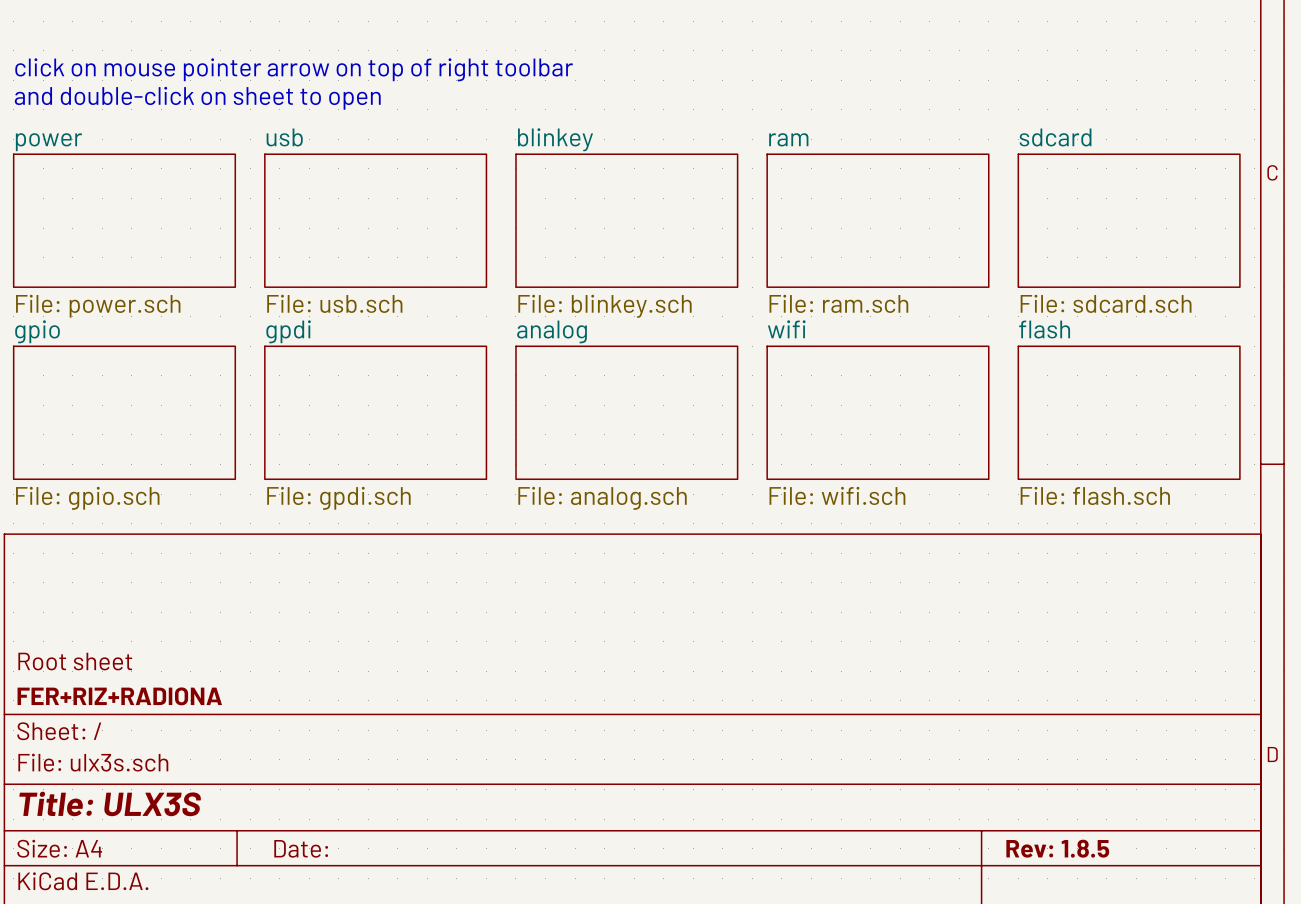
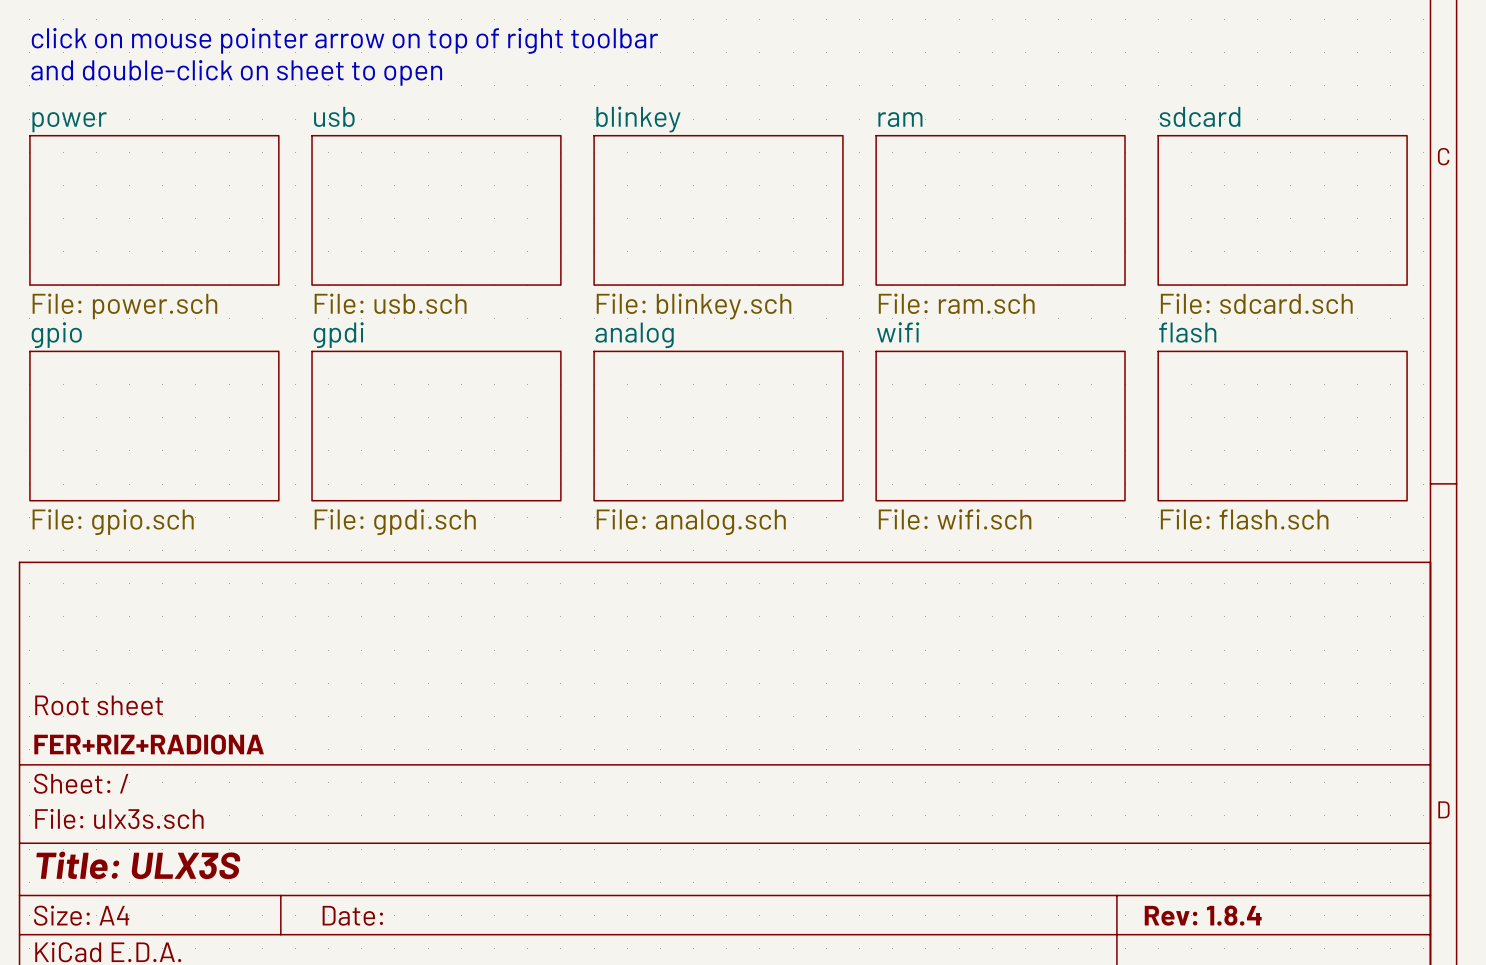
title block: Rev: 1.8.5 (1057, 848) -> Rev: 1.8.4 (1203, 915)

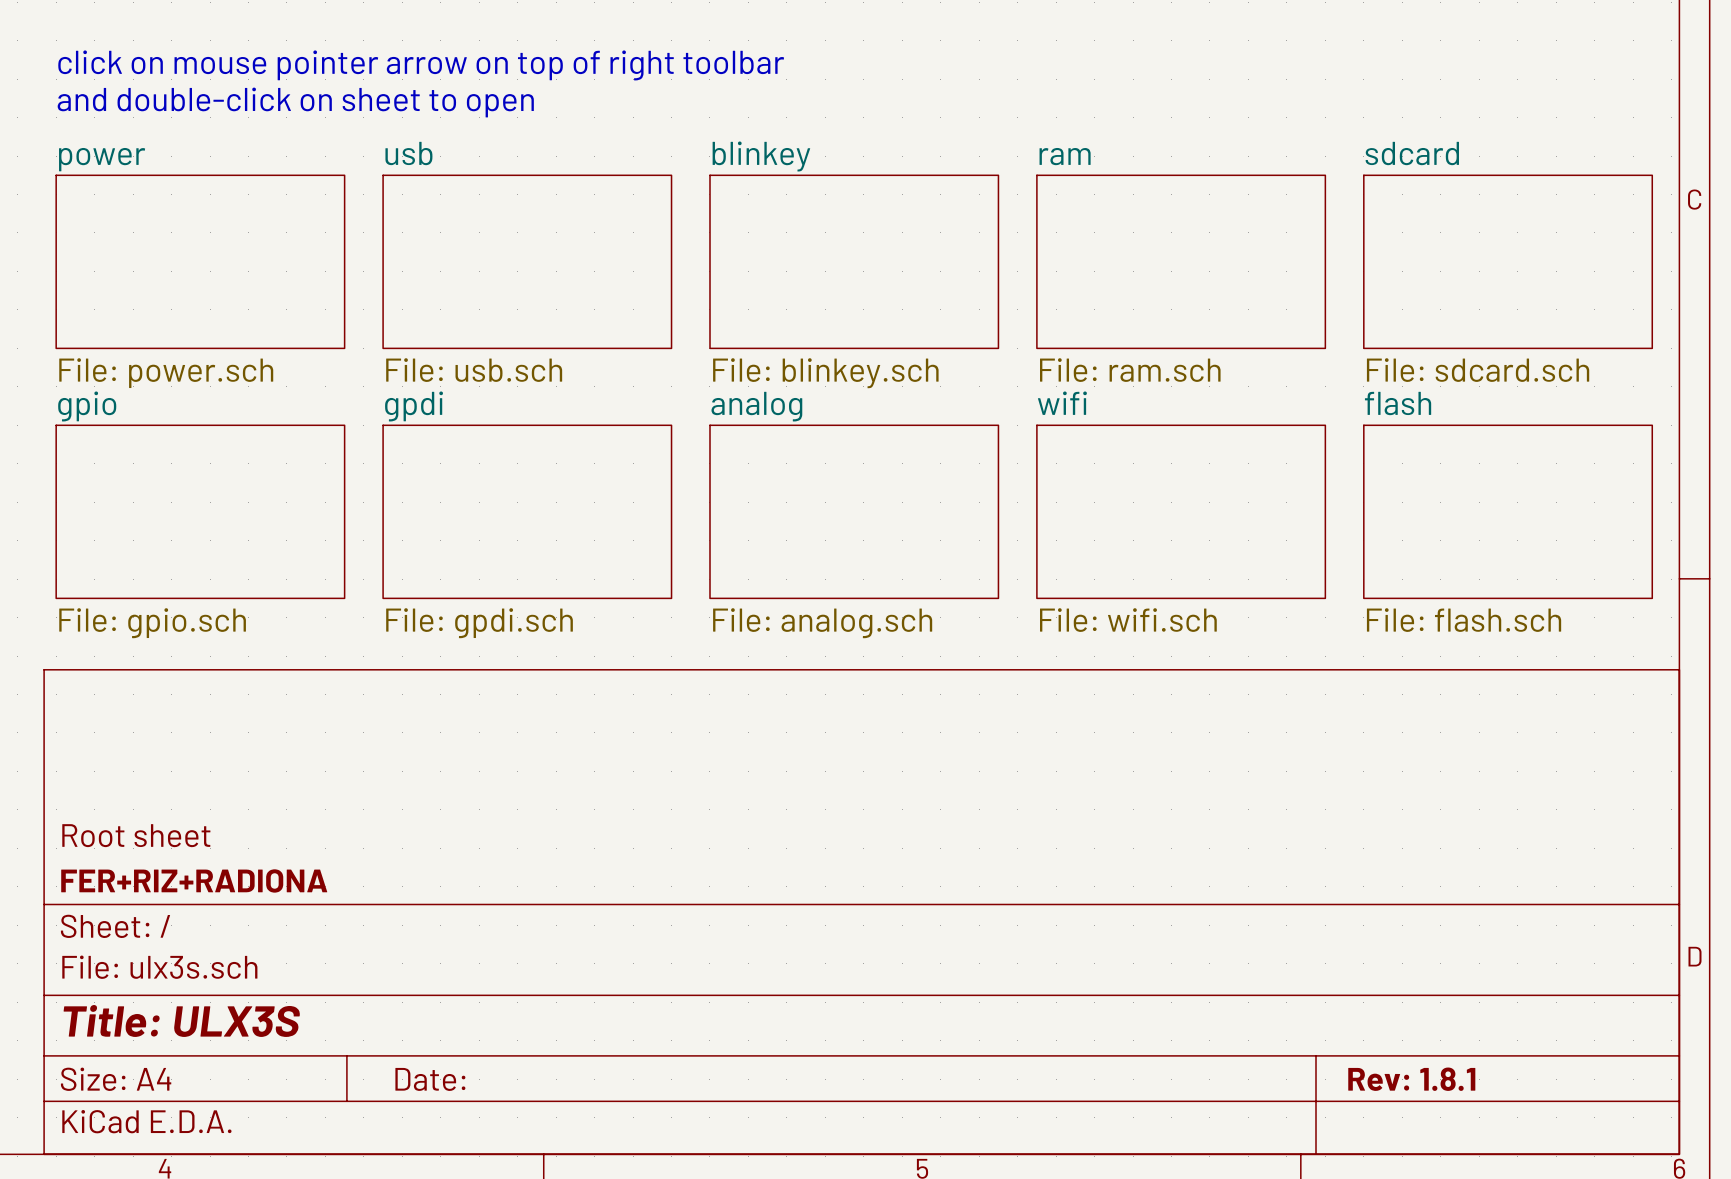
title block: Rev: 1.8.4 (1203, 915) -> Rev: 1.8.1 (1411, 1079)

